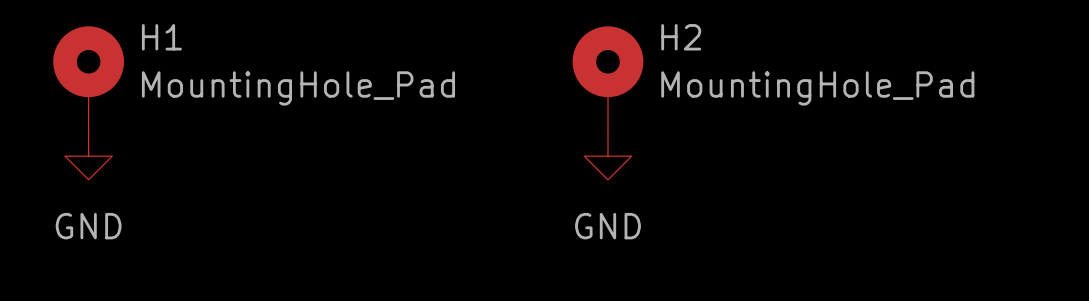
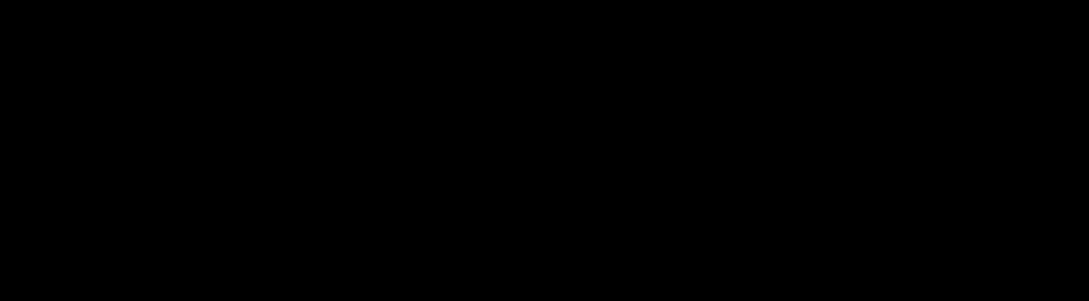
H1: MountingHole_Pad (88, 79) -> none
H2: MountingHole_Pad (607, 79) -> none
power symbol: GND (88, 156) -> none
power symbol: GND (607, 156) -> none

